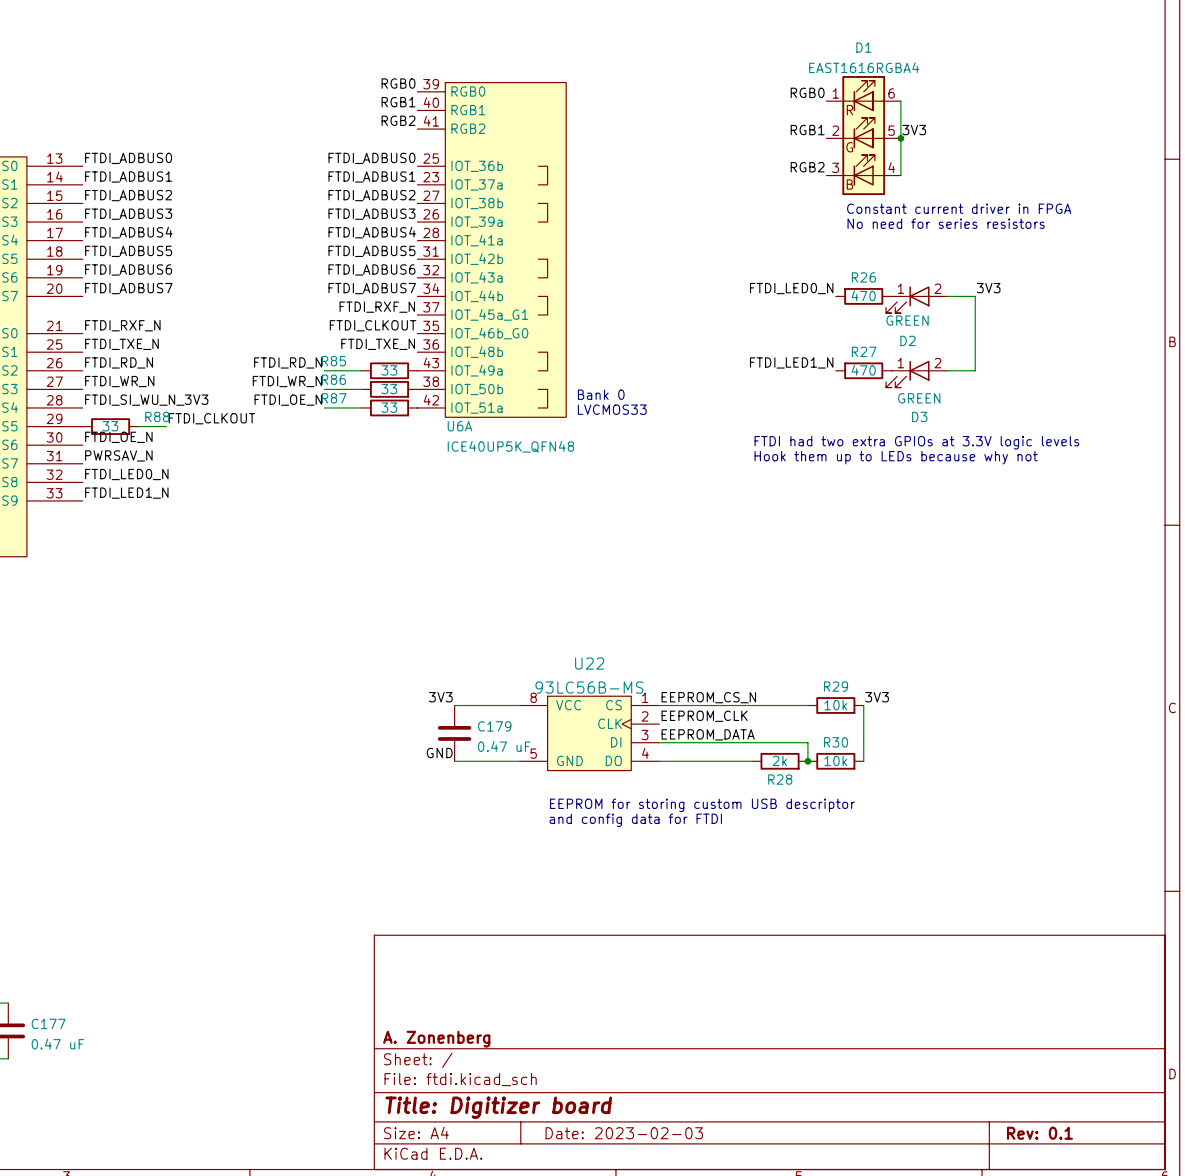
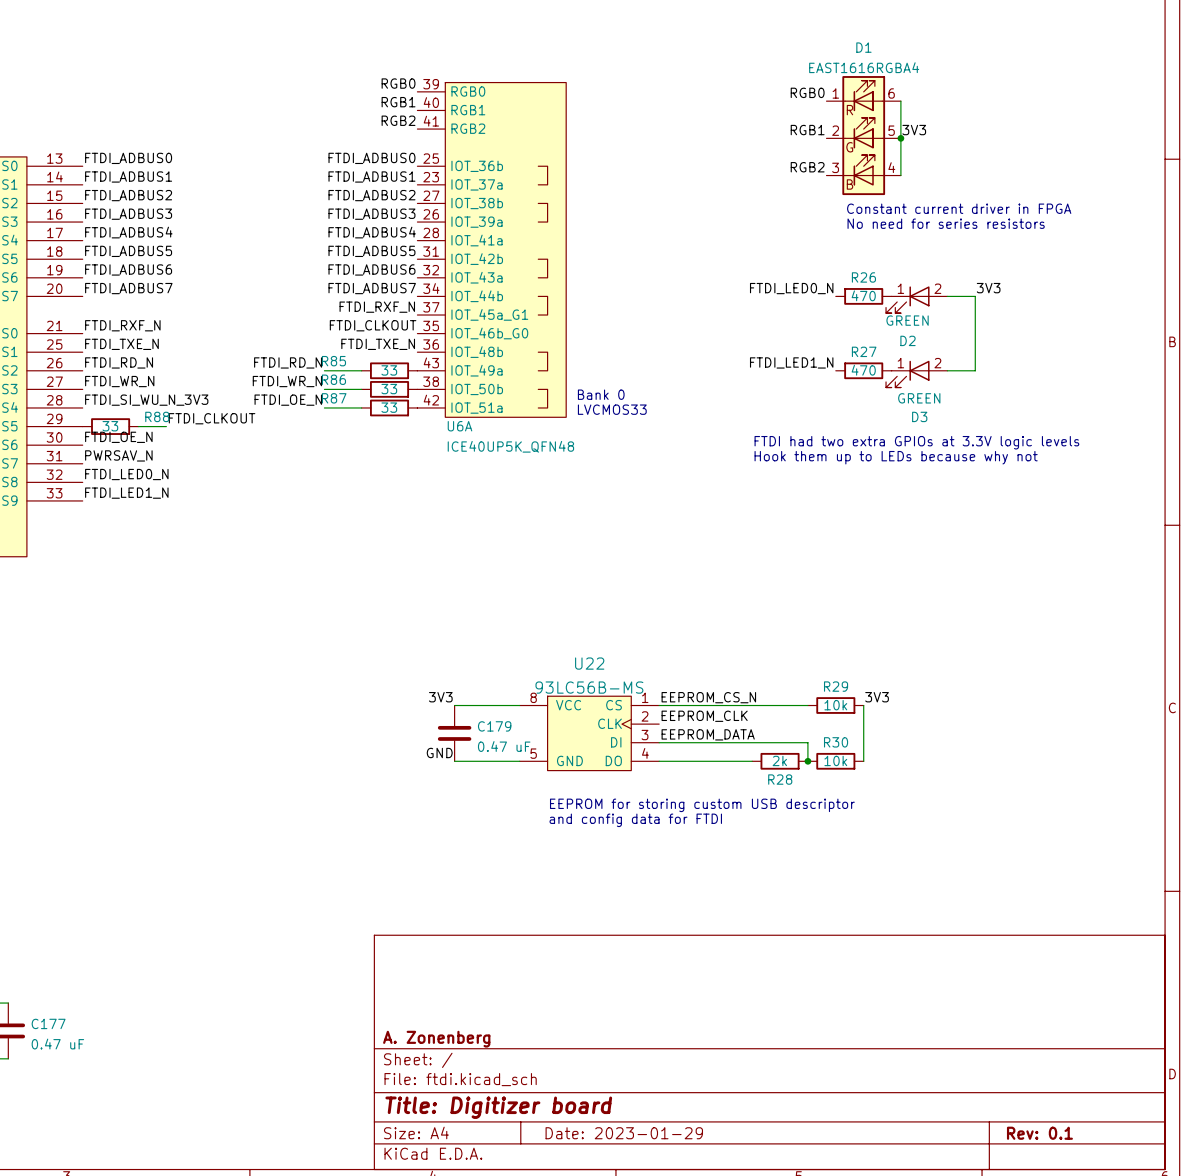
title block: Date: 2023-02-03 (624, 1133) -> Date: 2023-01-29 (624, 1133)

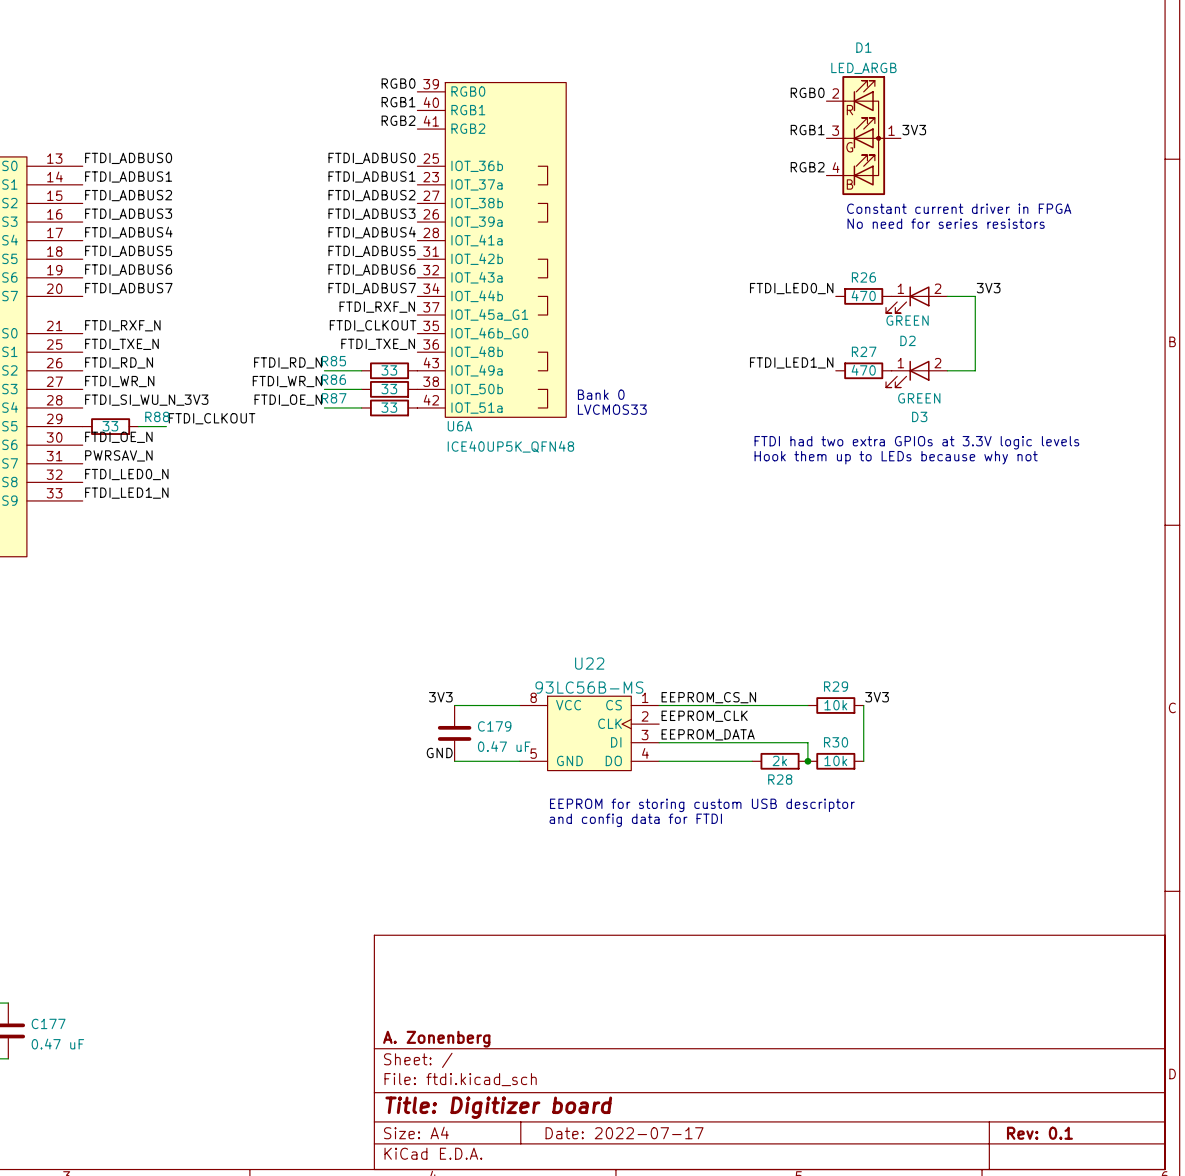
D1 value: EAST1616RGBA4 (864, 67) -> LED_ARGB (863, 68)
D1 symbol: [826, 76, 901, 196] -> [826, 76, 901, 196]
wire: (900, 101) (900, 175) -> none
junction: (900, 138) -> none
title block: Date: 2023-01-29 (624, 1133) -> Date: 2022-07-17 (624, 1133)

